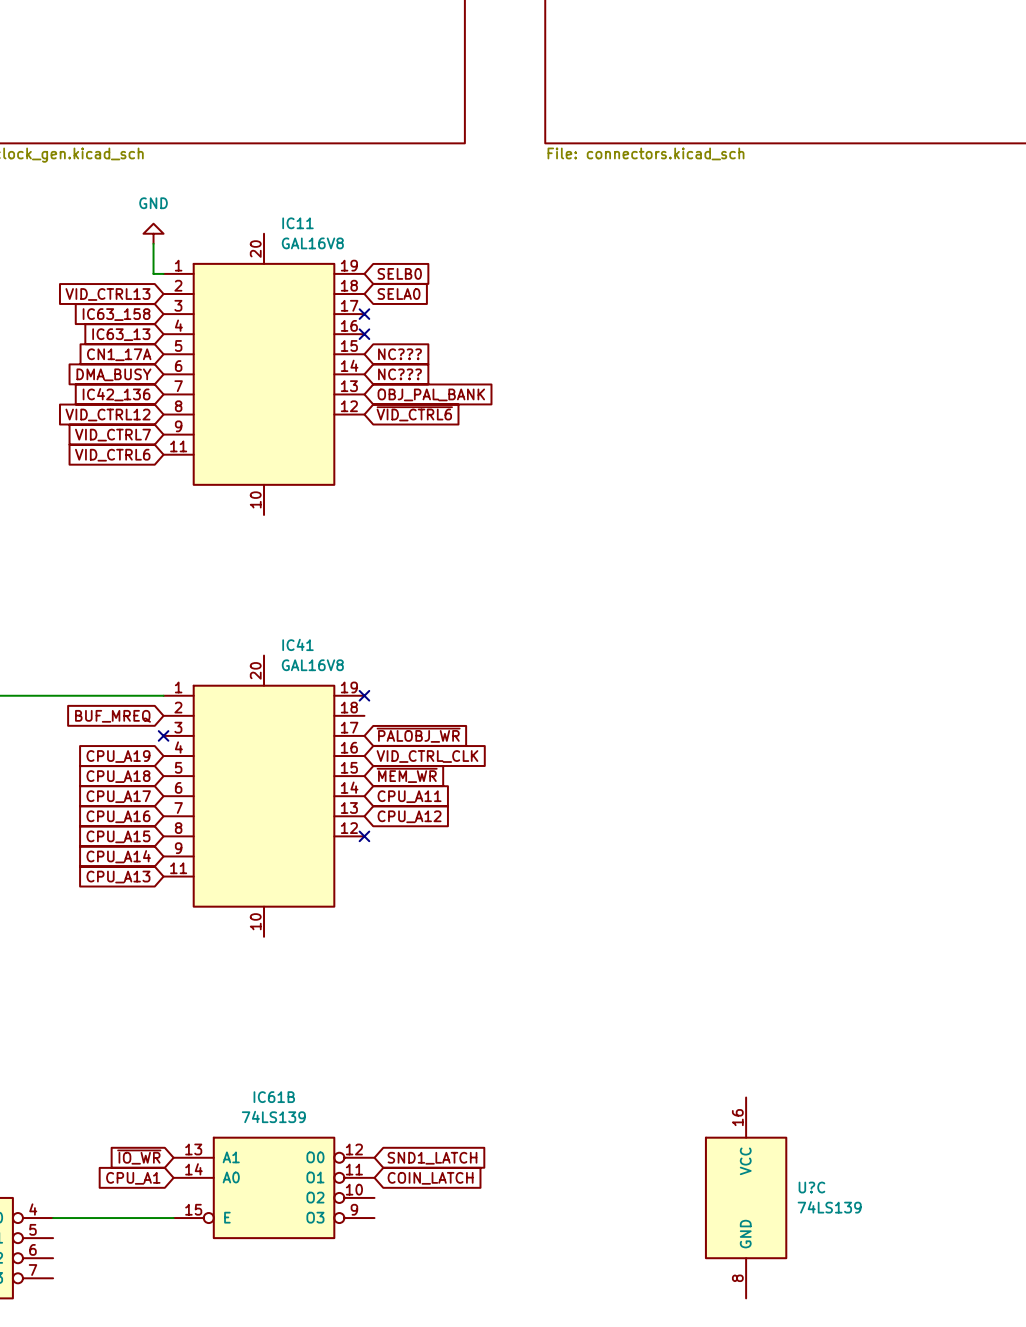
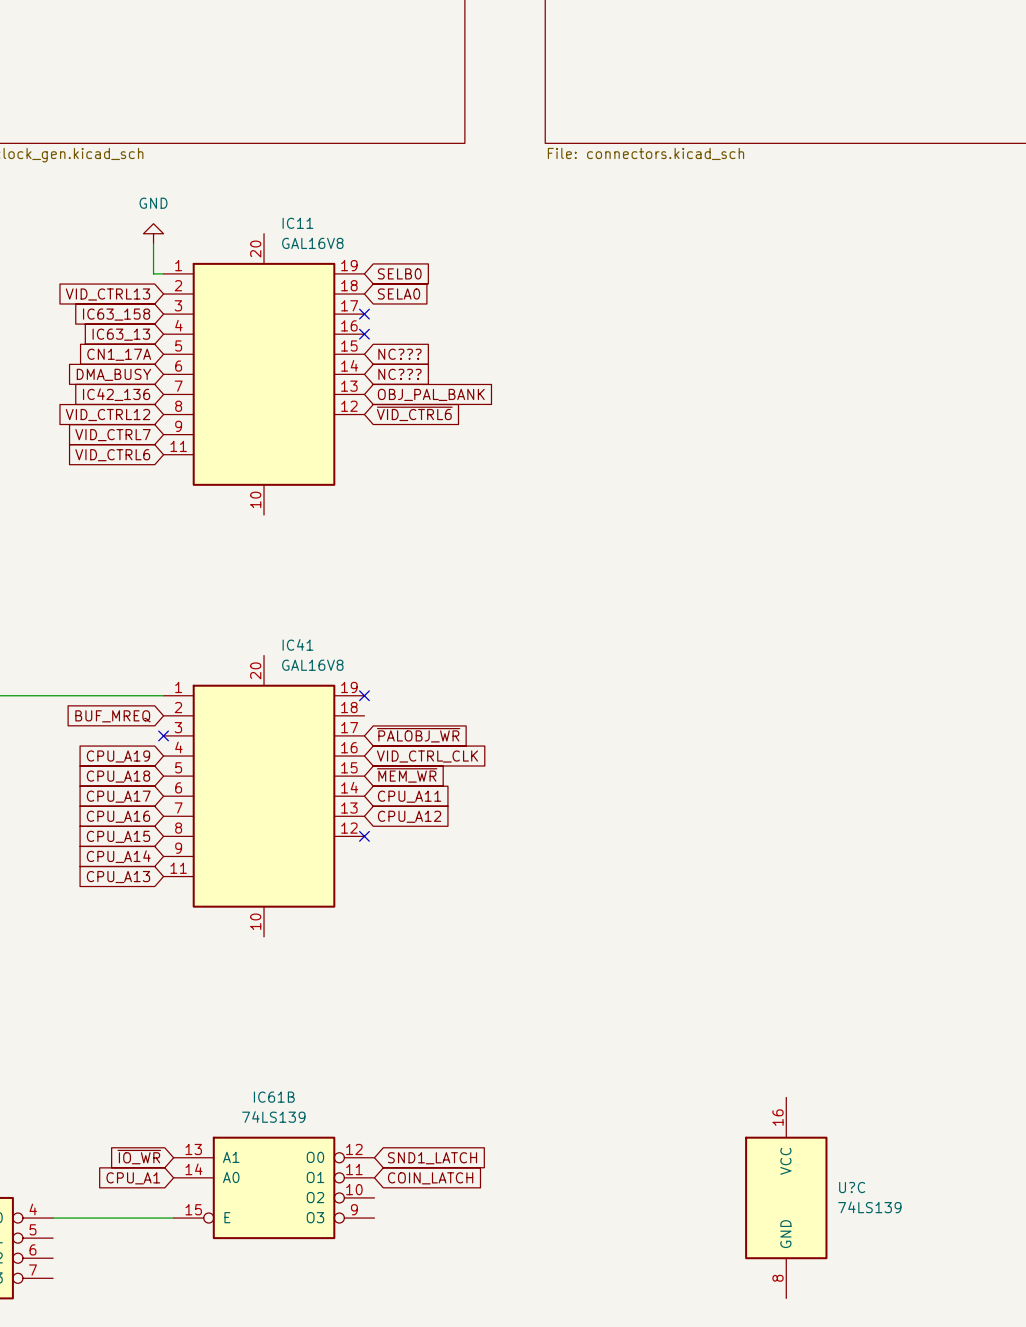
U?C position: (746, 1197) -> (786, 1197)

